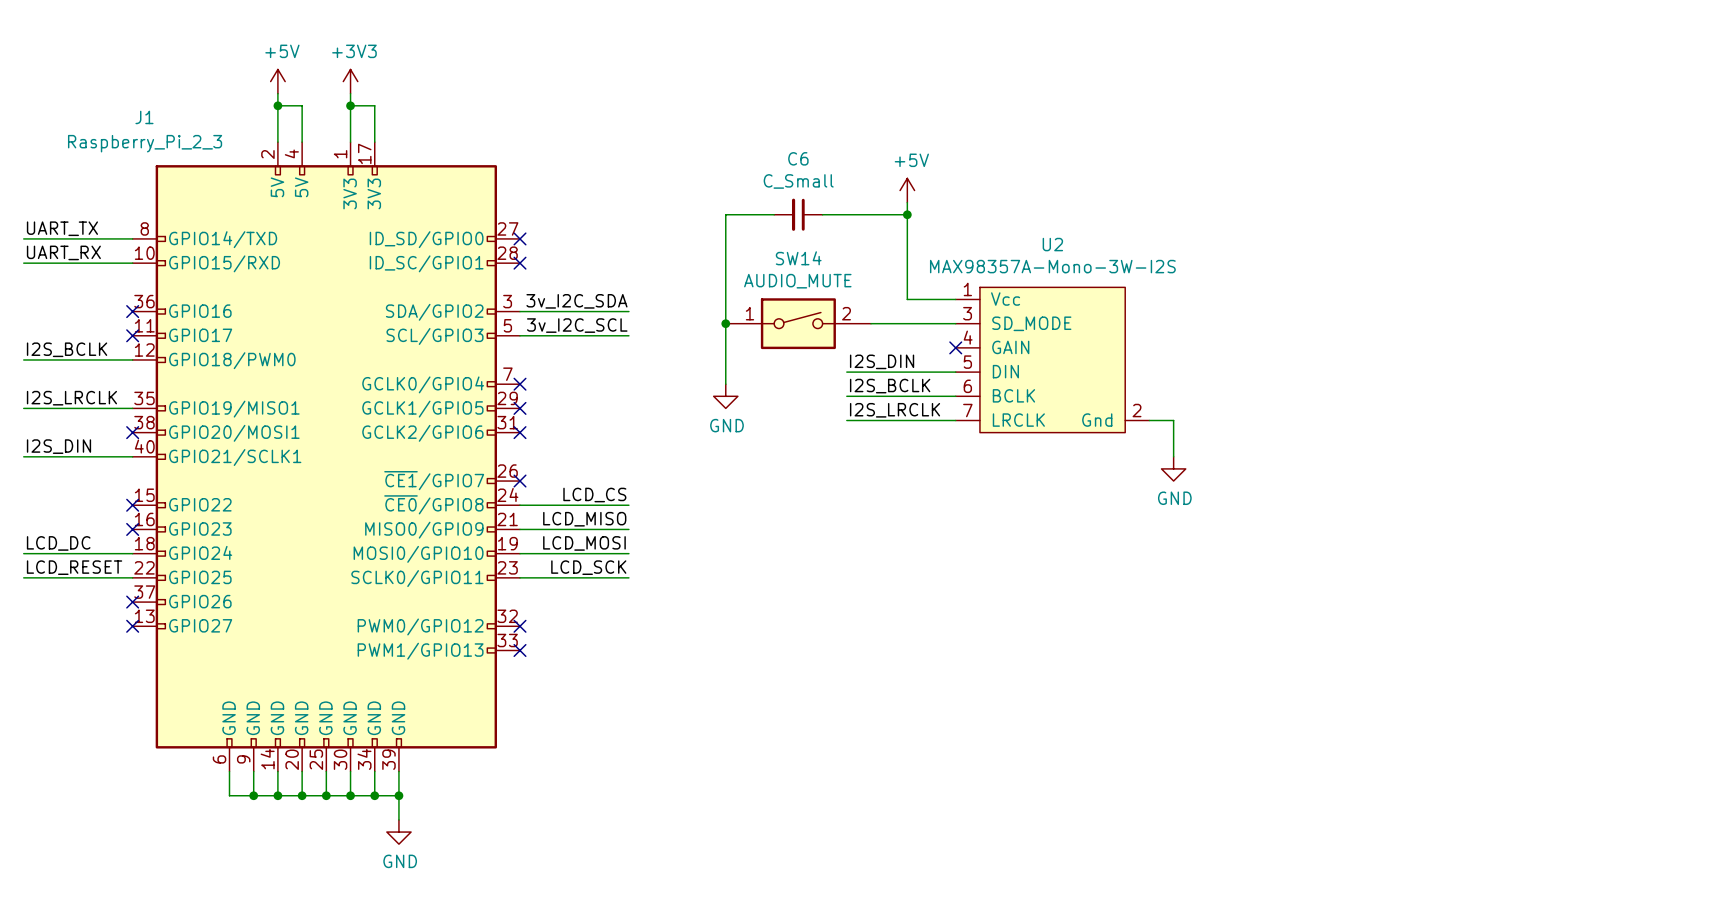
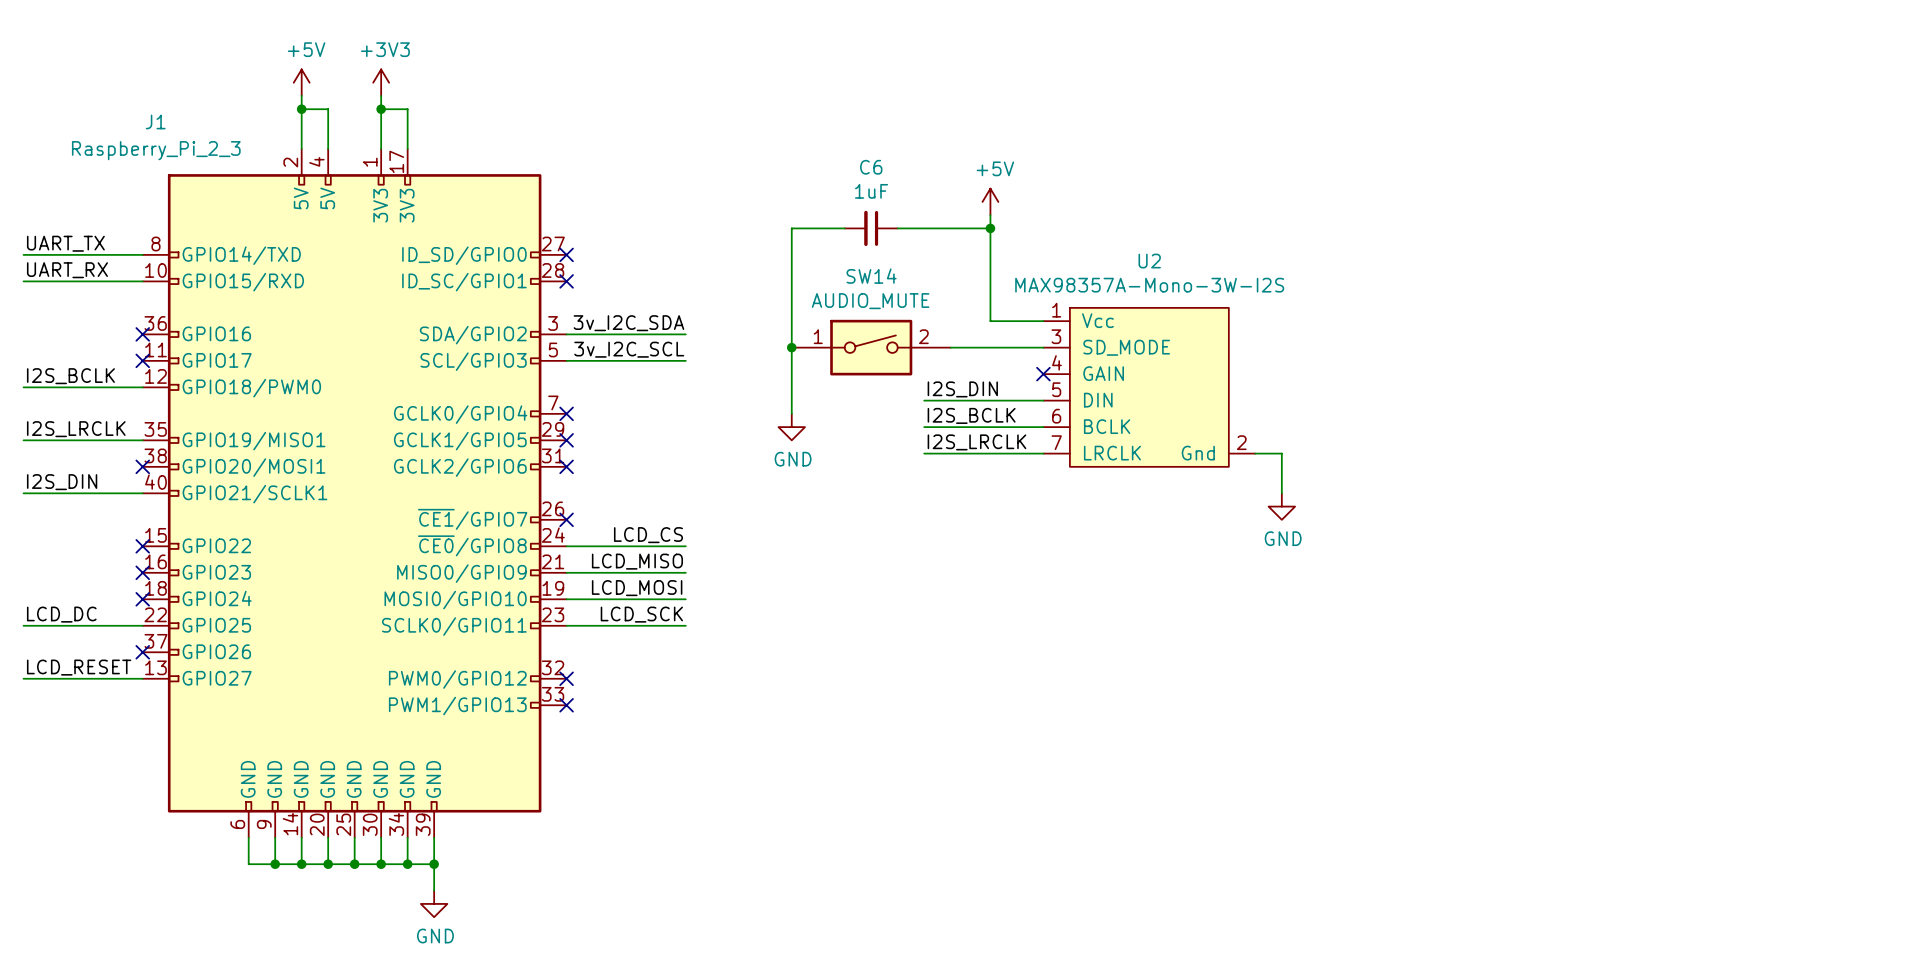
C6 value: C_Small (798, 181) -> 1uF (871, 191)
label: LCD_DC (58, 543) -> none
wire: (23, 553) (132, 553) -> (23, 678) (142, 678)
no-connect mark: none -> (142, 599)
label: LCD_RESET (74, 567) -> LCD_DC (61, 614)
label: none -> LCD_RESET (79, 667)
no-connect mark: (132, 626) -> none

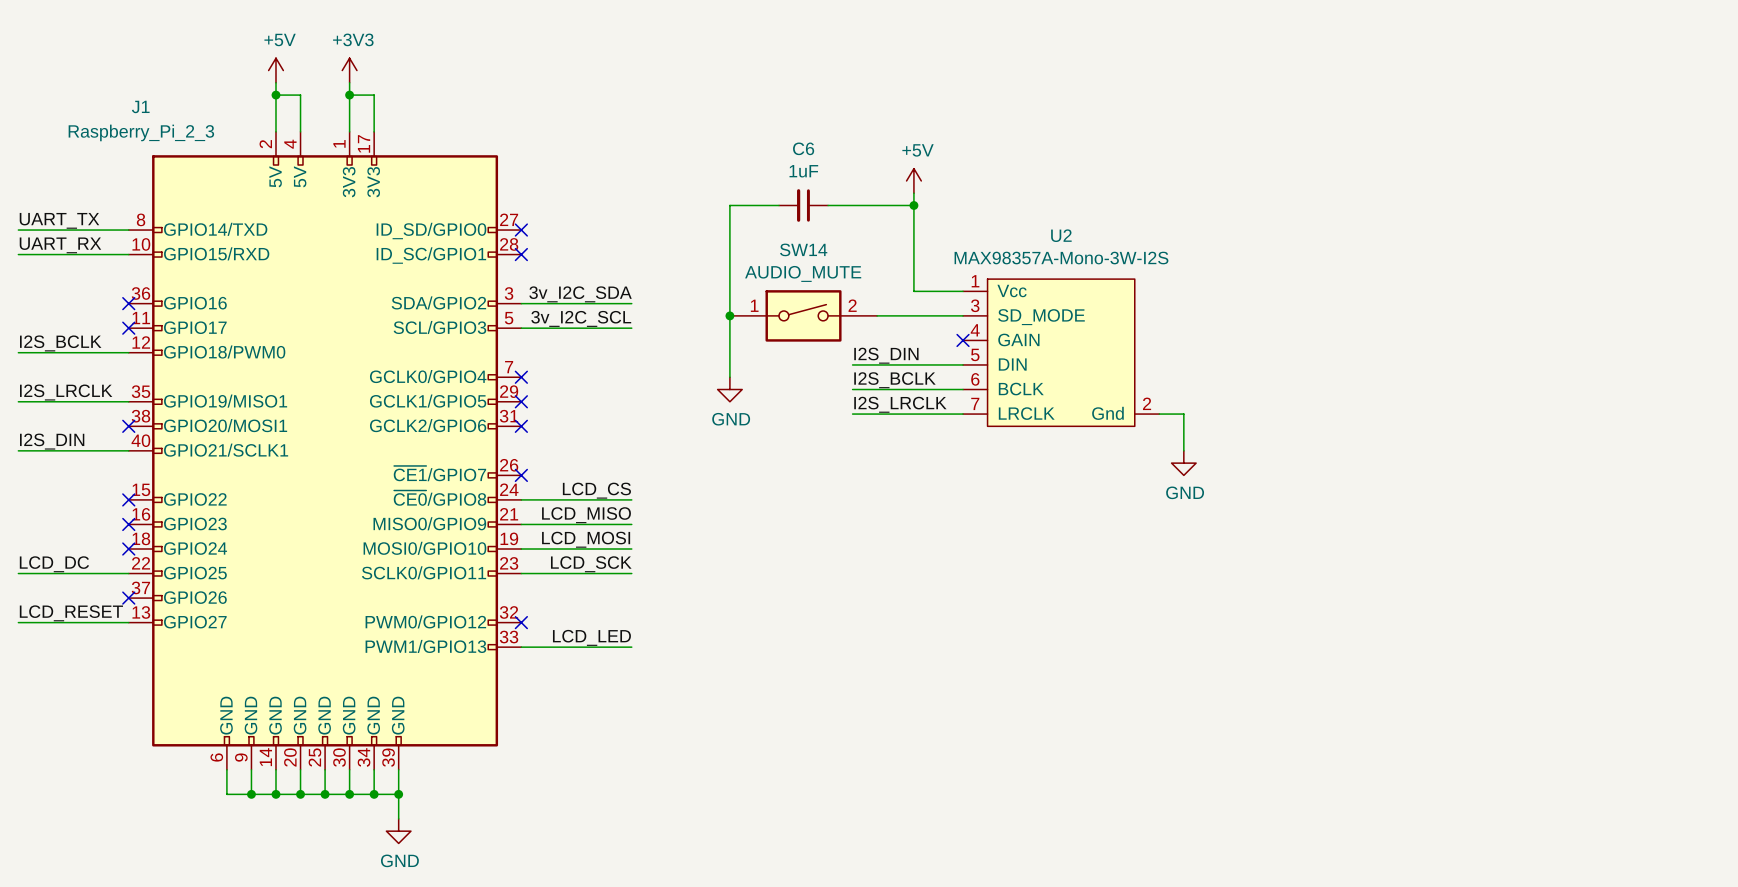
label: none -> LCD_LED (591, 637)
wire: none -> (521, 647) (631, 647)
no-connect mark: (566, 705) -> none

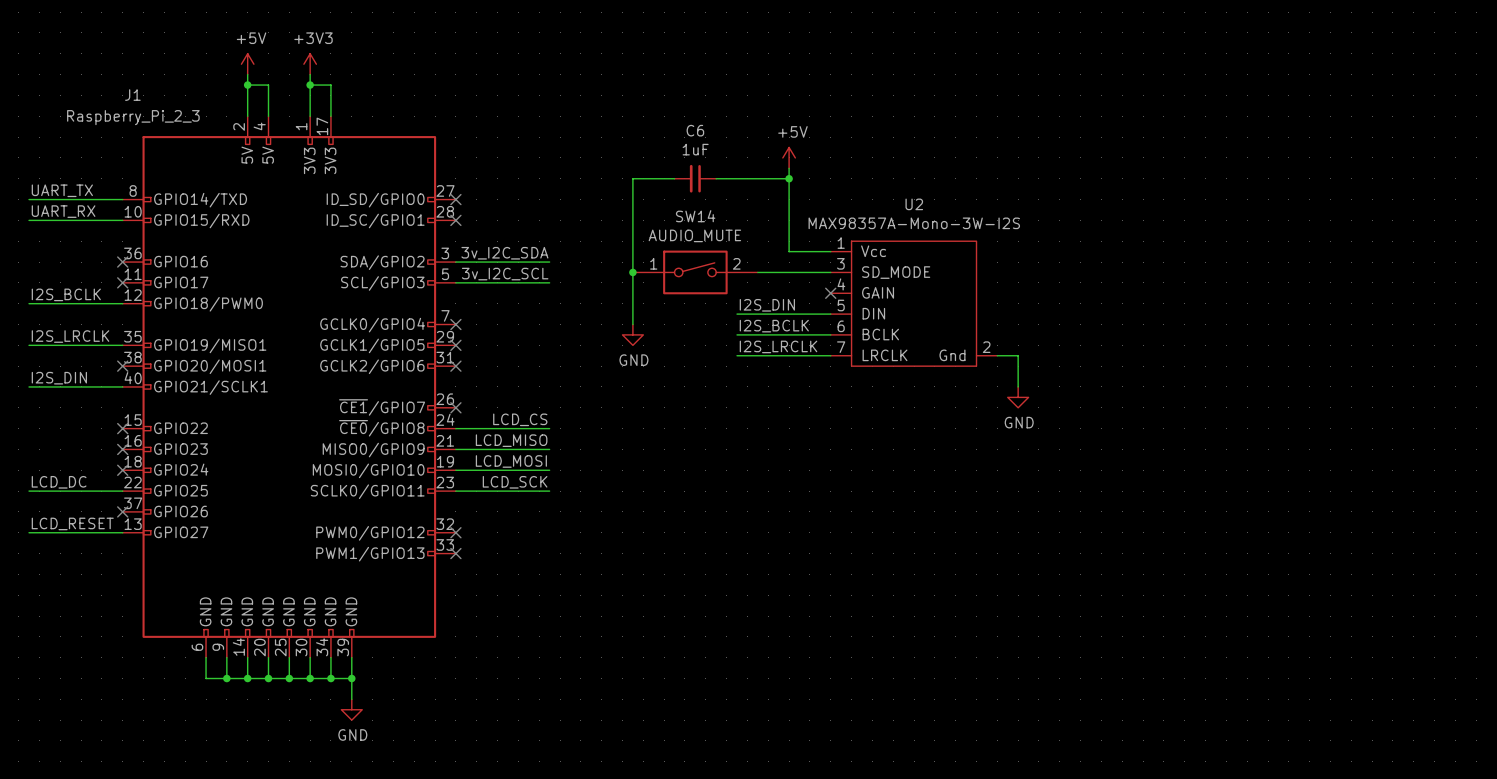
label: LCD_LED (591, 637) -> none
wire: (521, 647) (631, 647) -> none
no-connect mark: none -> (455, 553)

